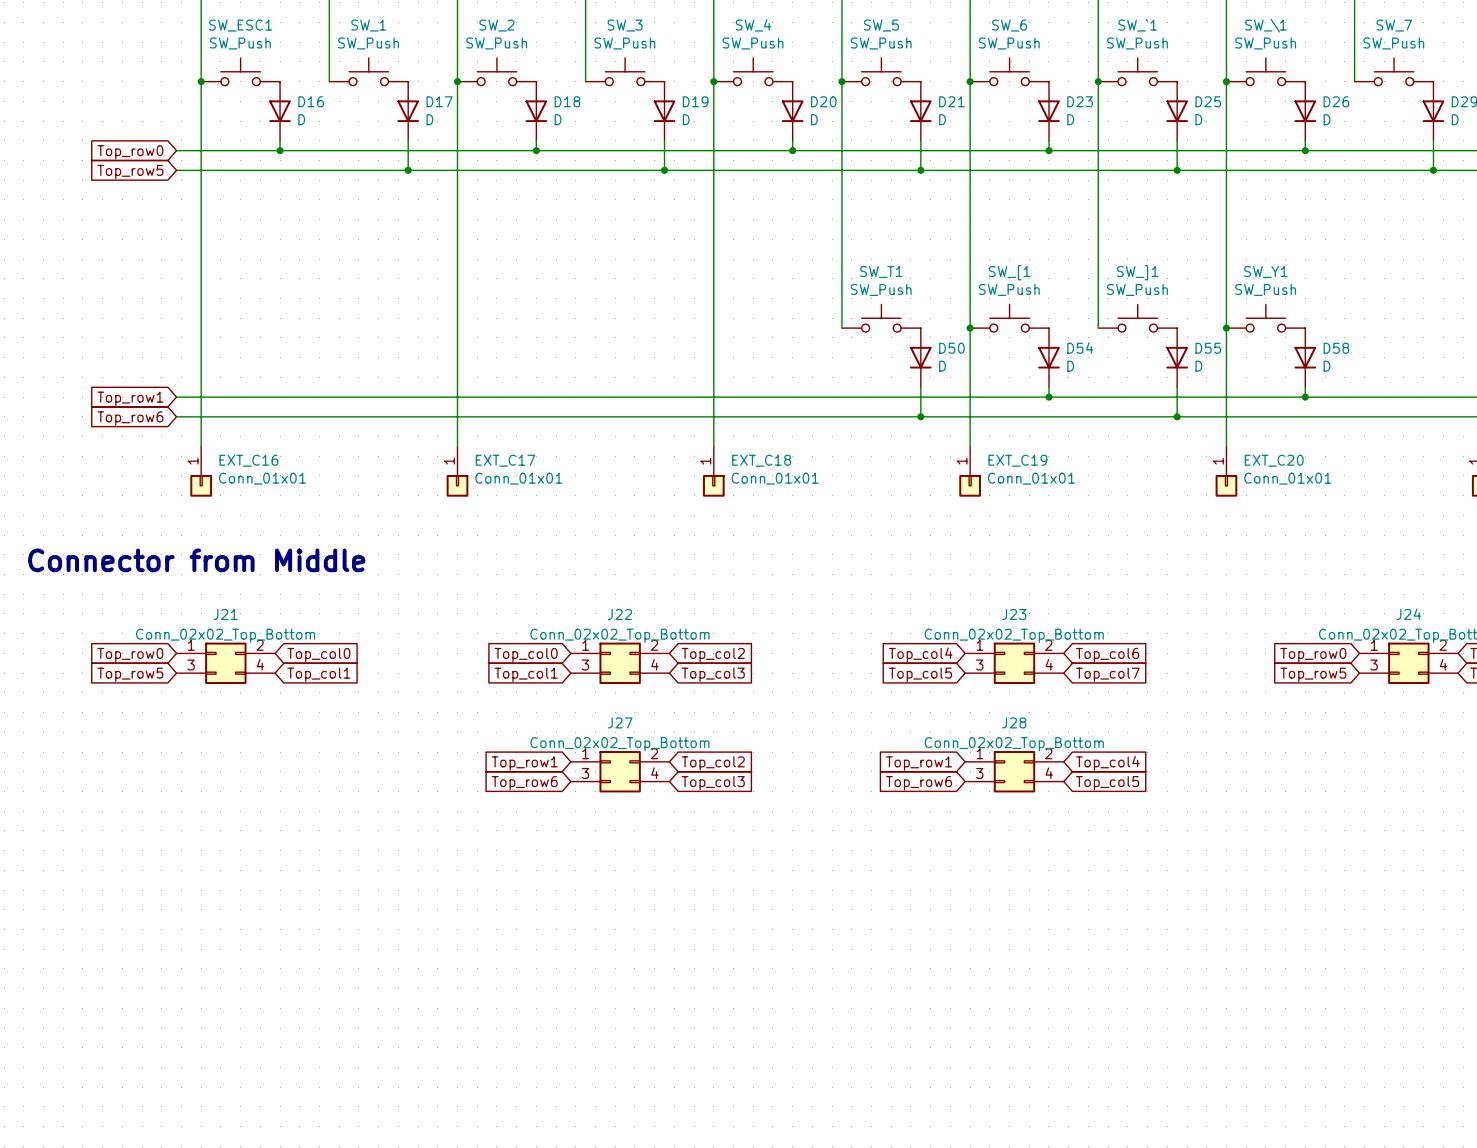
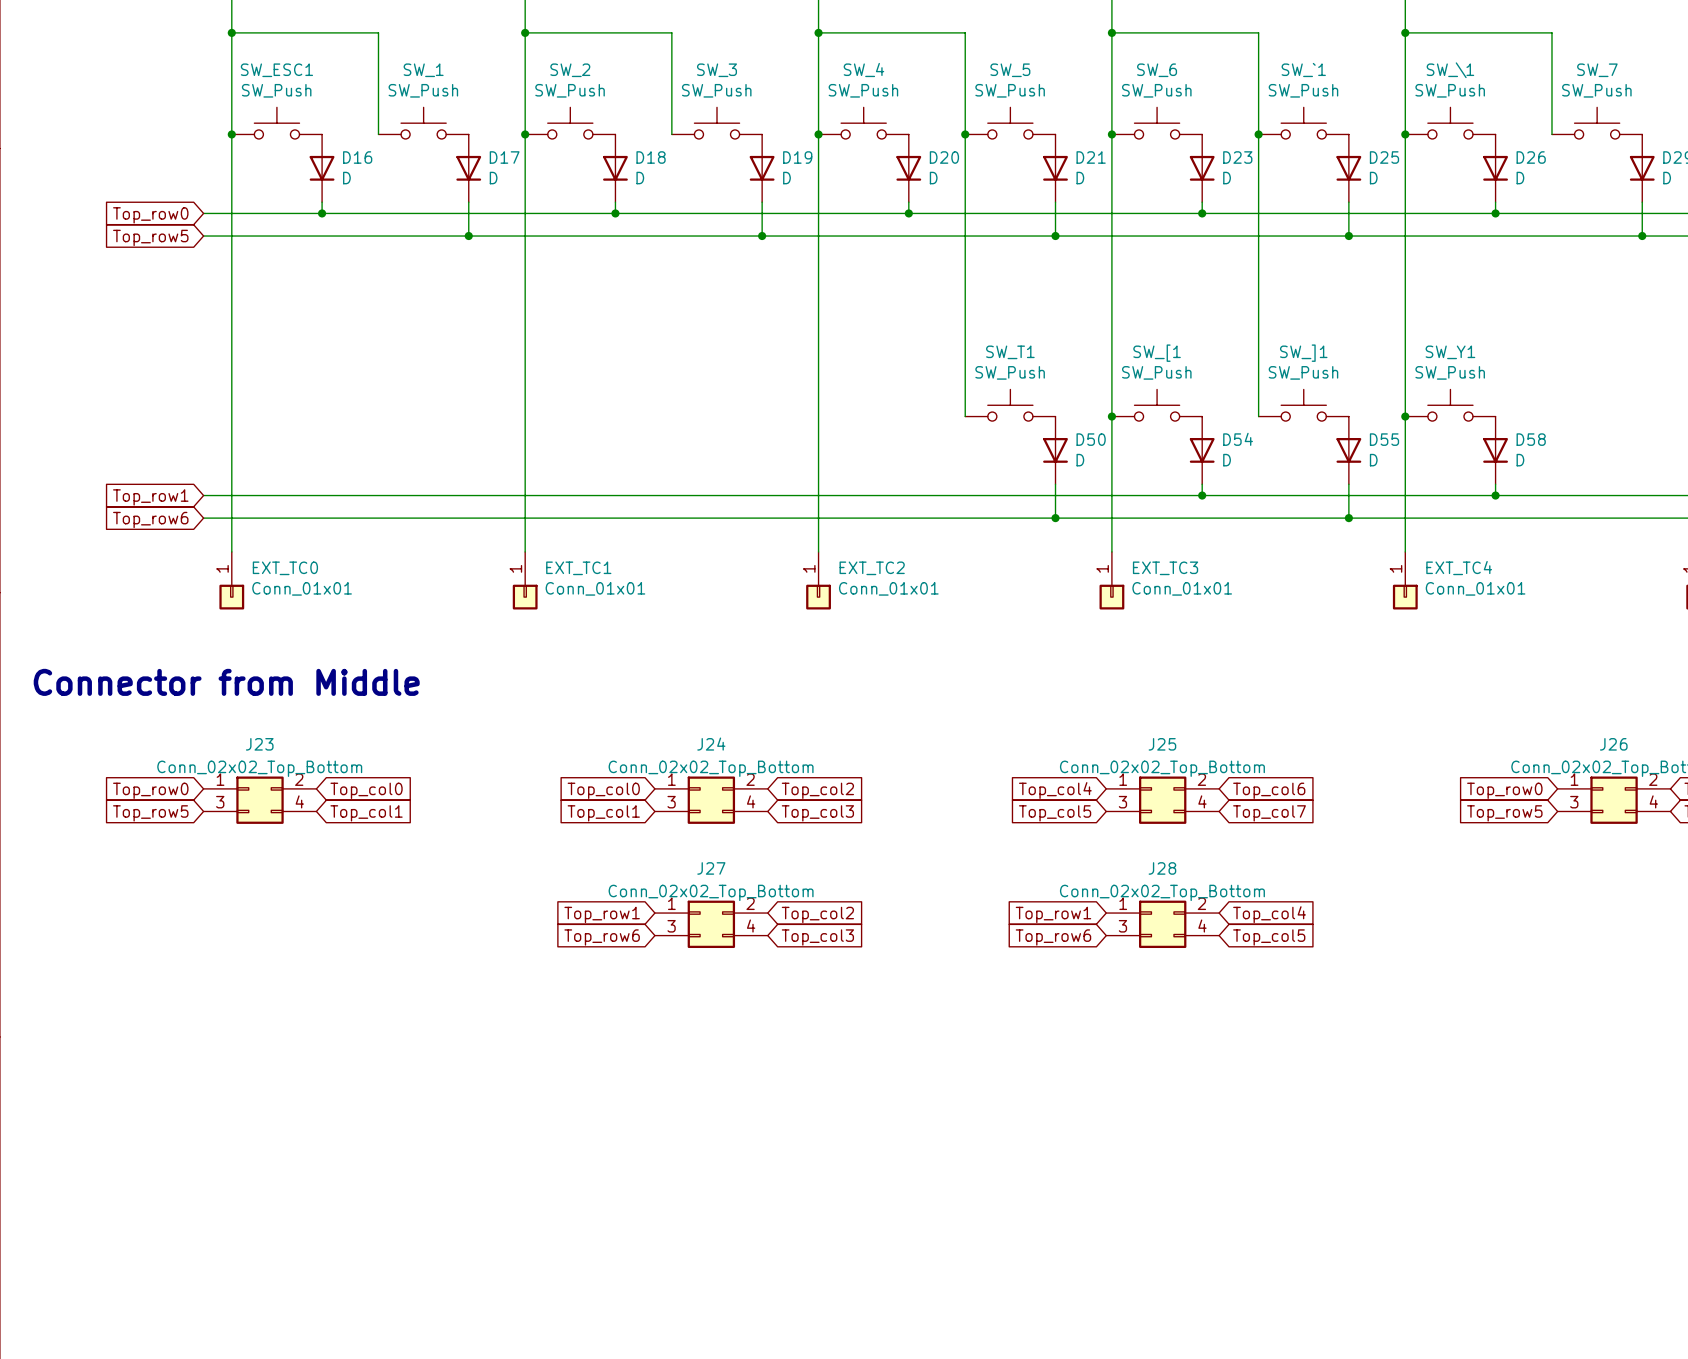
EXT_C16 name: EXT_C16 (248, 460) -> EXT_TC0 (285, 568)
EXT_C17 name: EXT_C17 (505, 460) -> EXT_TC1 (578, 568)
EXT_C18 name: EXT_C18 (761, 460) -> EXT_TC2 (872, 568)
EXT_C19 name: EXT_C19 (1017, 460) -> EXT_TC3 (1165, 568)
EXT_C20 name: EXT_C20 (1274, 460) -> EXT_TC4 (1459, 568)
J21 name: J21 (225, 614) -> J23 (259, 744)
J22 name: J22 (619, 614) -> J24 (711, 744)
J23 name: J23 (1014, 614) -> J25 (1162, 744)
J24 name: J24 (1408, 614) -> J26 (1613, 744)

